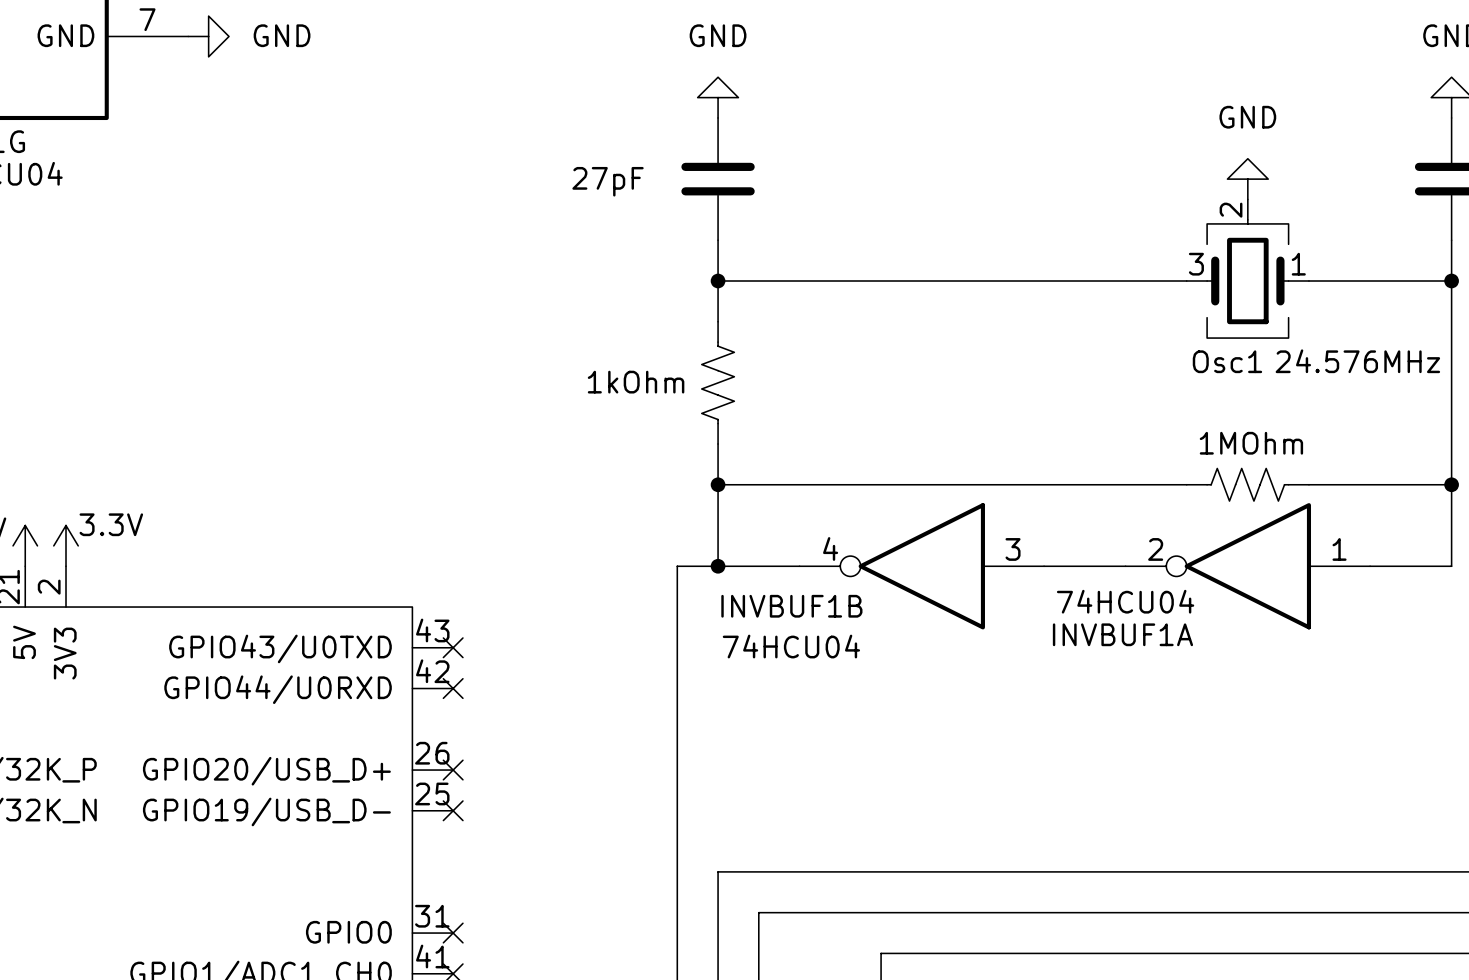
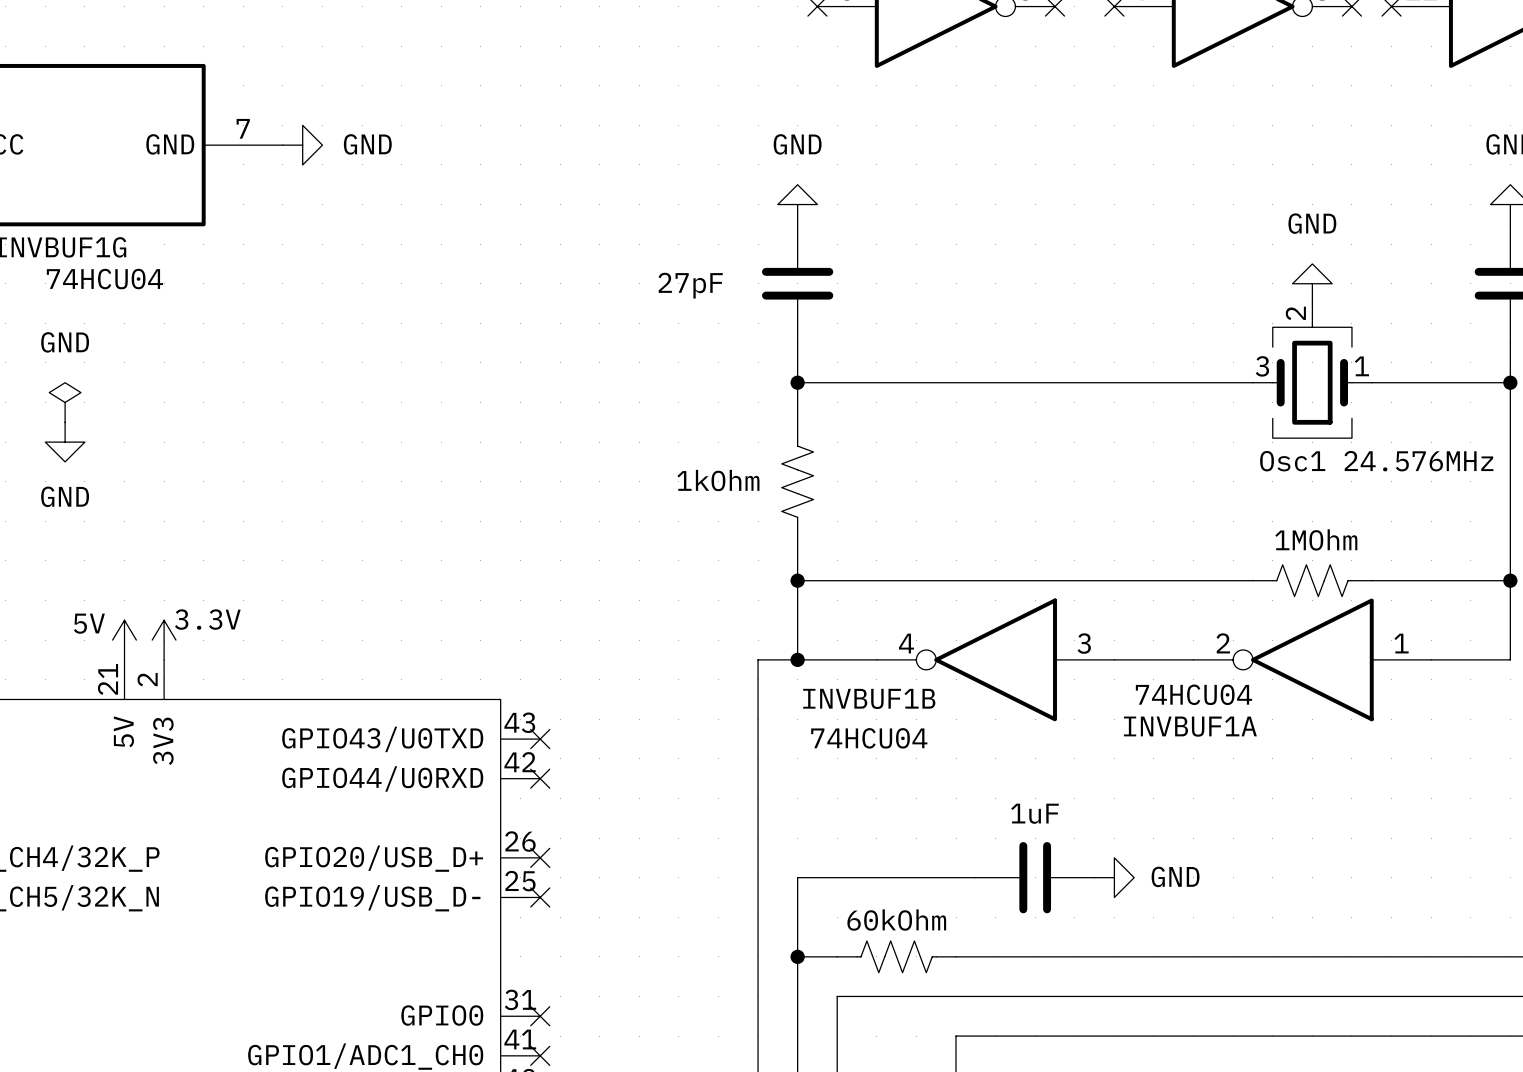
wire: none -> (975, 877) (797, 877) (797, 956)
part: none -> 1uF (1035, 877)
power symbol: none -> GND (1114, 877)
junction: none -> (797, 956)
wire: (758, 871) (881, 871) -> none
part: none -> 60kOhm (896, 956)

